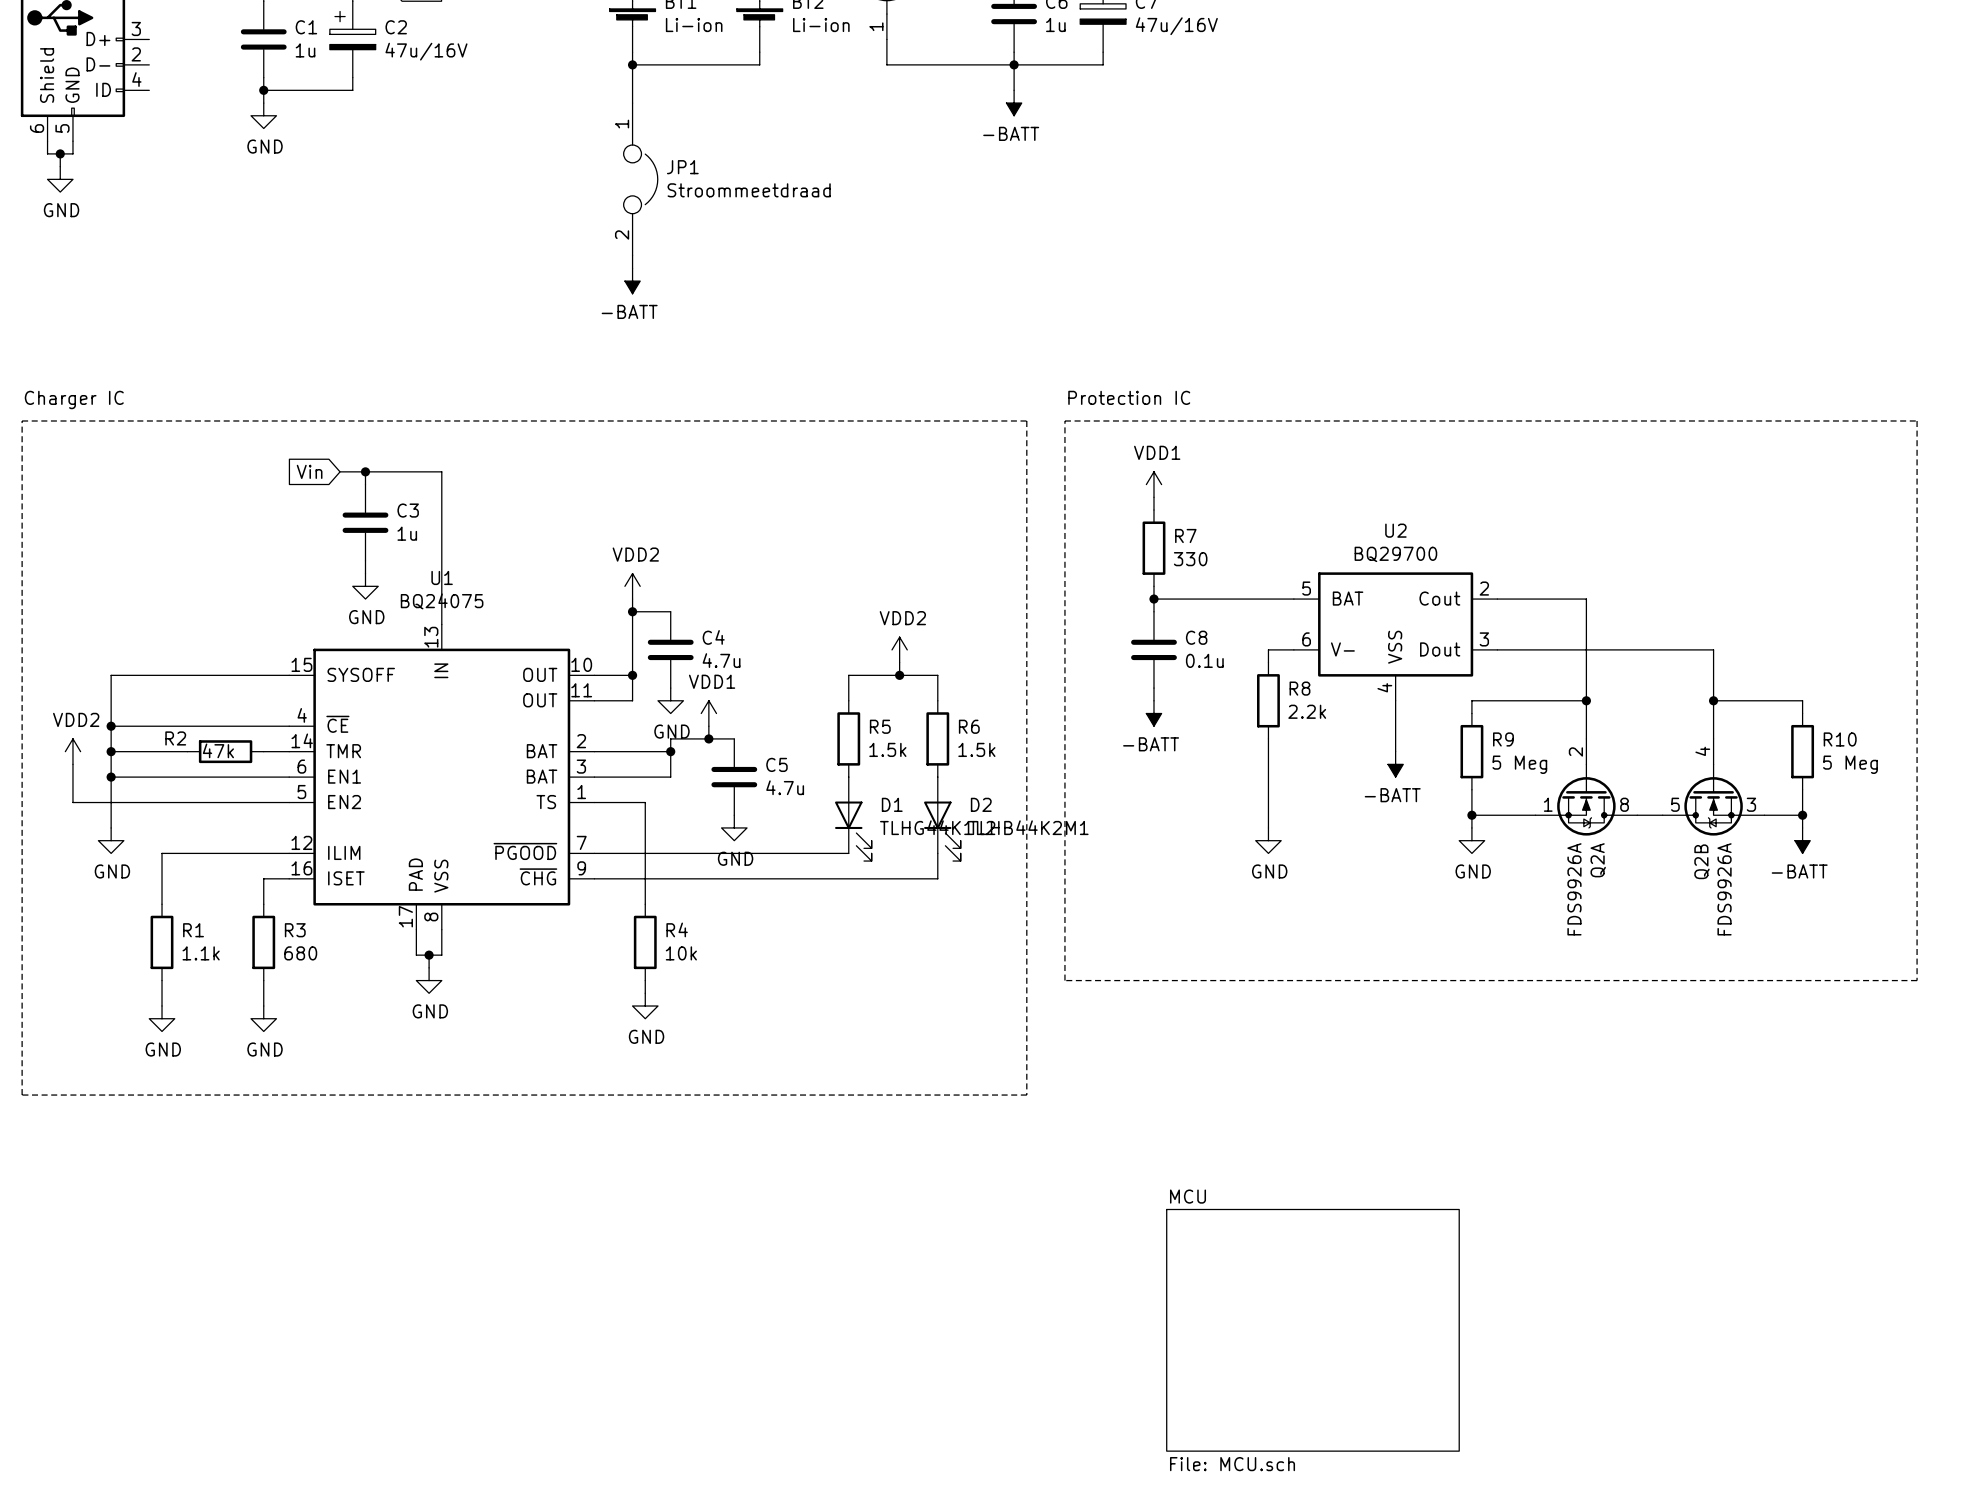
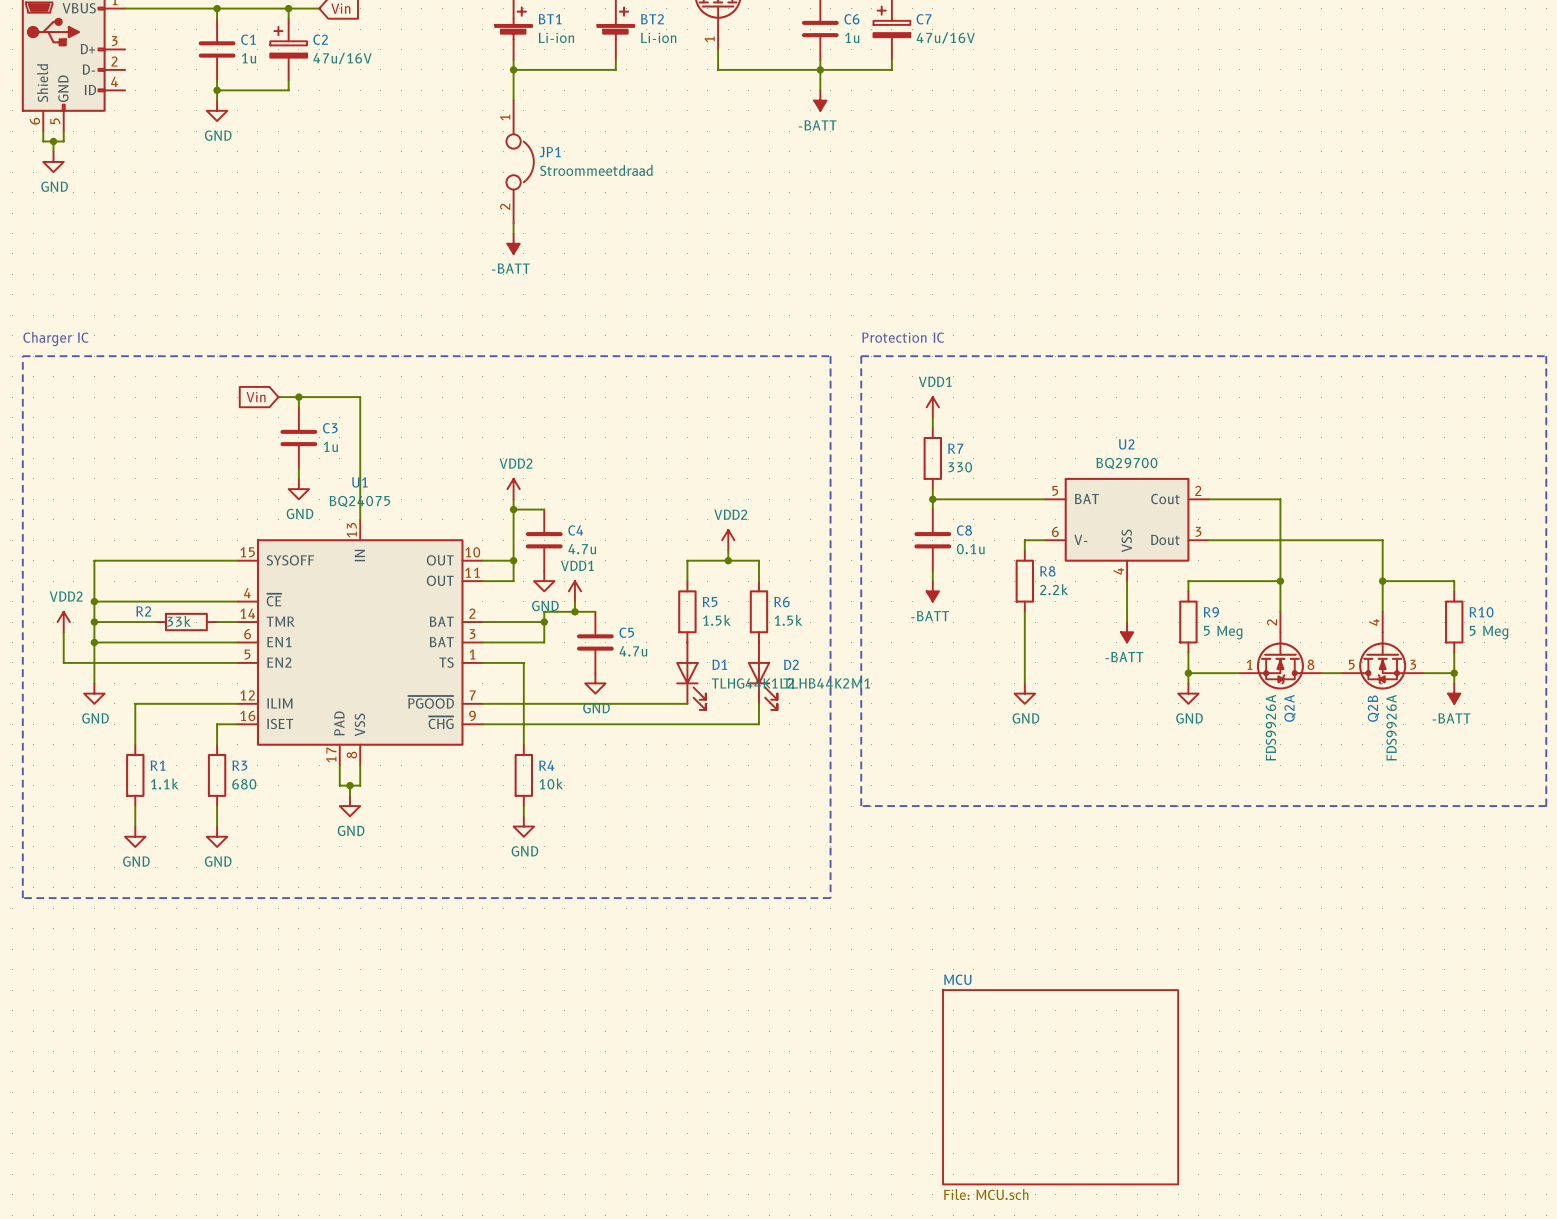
R2 value: 47k (218, 750) -> 33k (179, 621)

